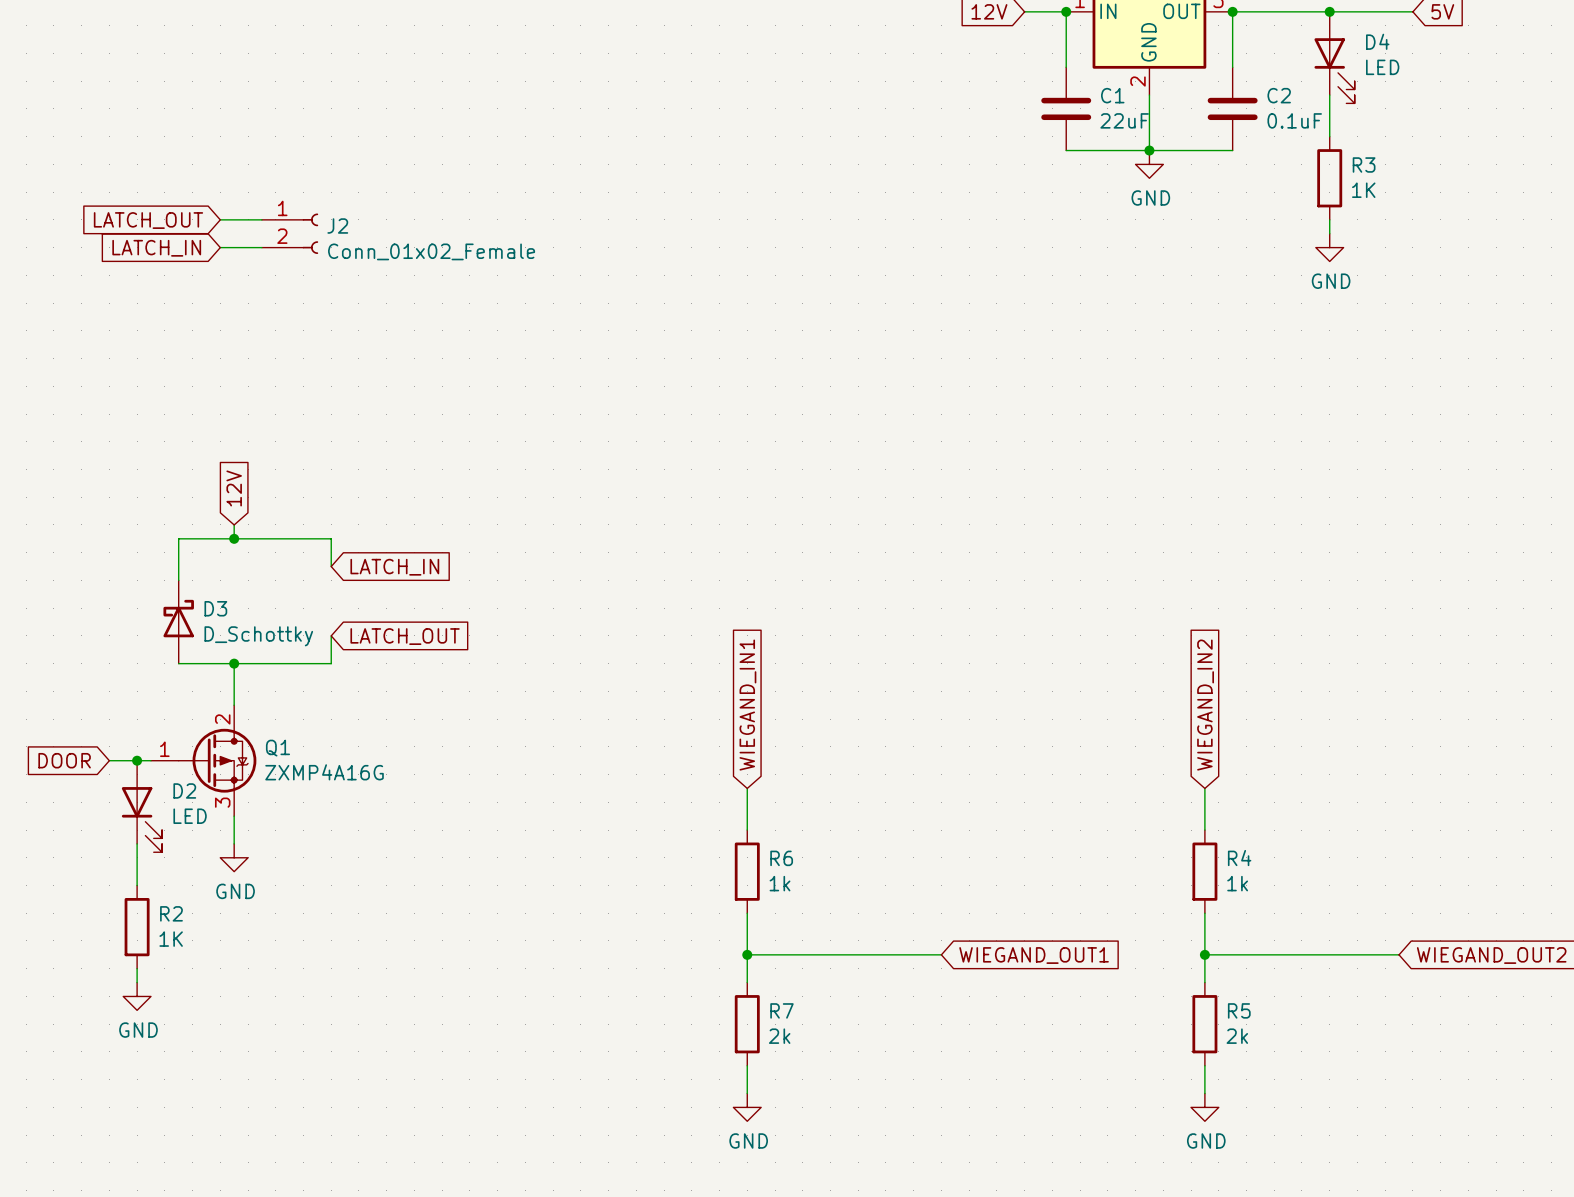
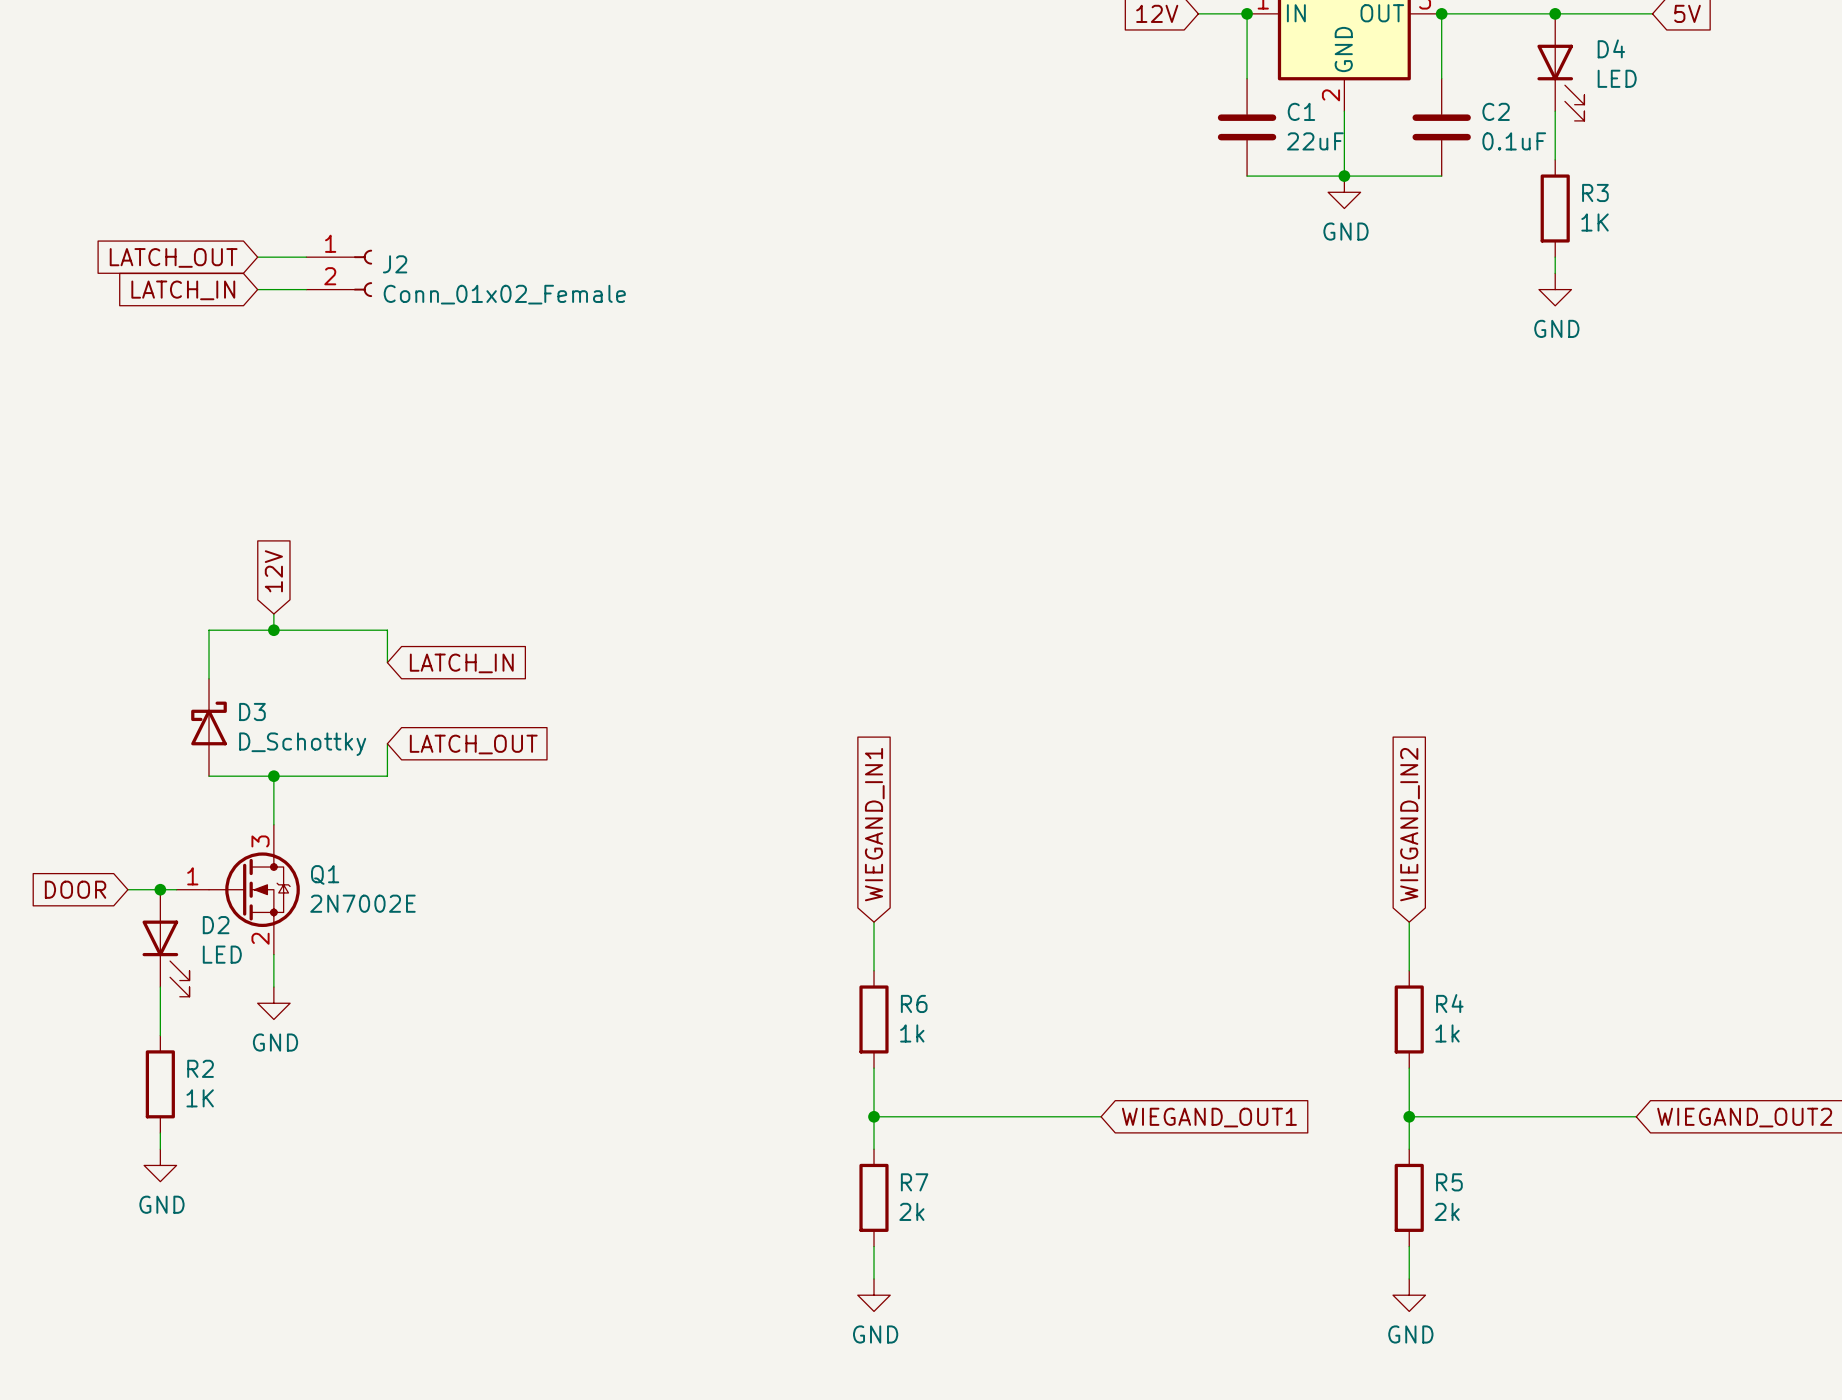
Q1 symbol: [150, 705, 257, 817] -> [176, 824, 300, 955]
Q1 value: ZXMP4A16G (324, 772) -> 2N7002E (362, 903)

